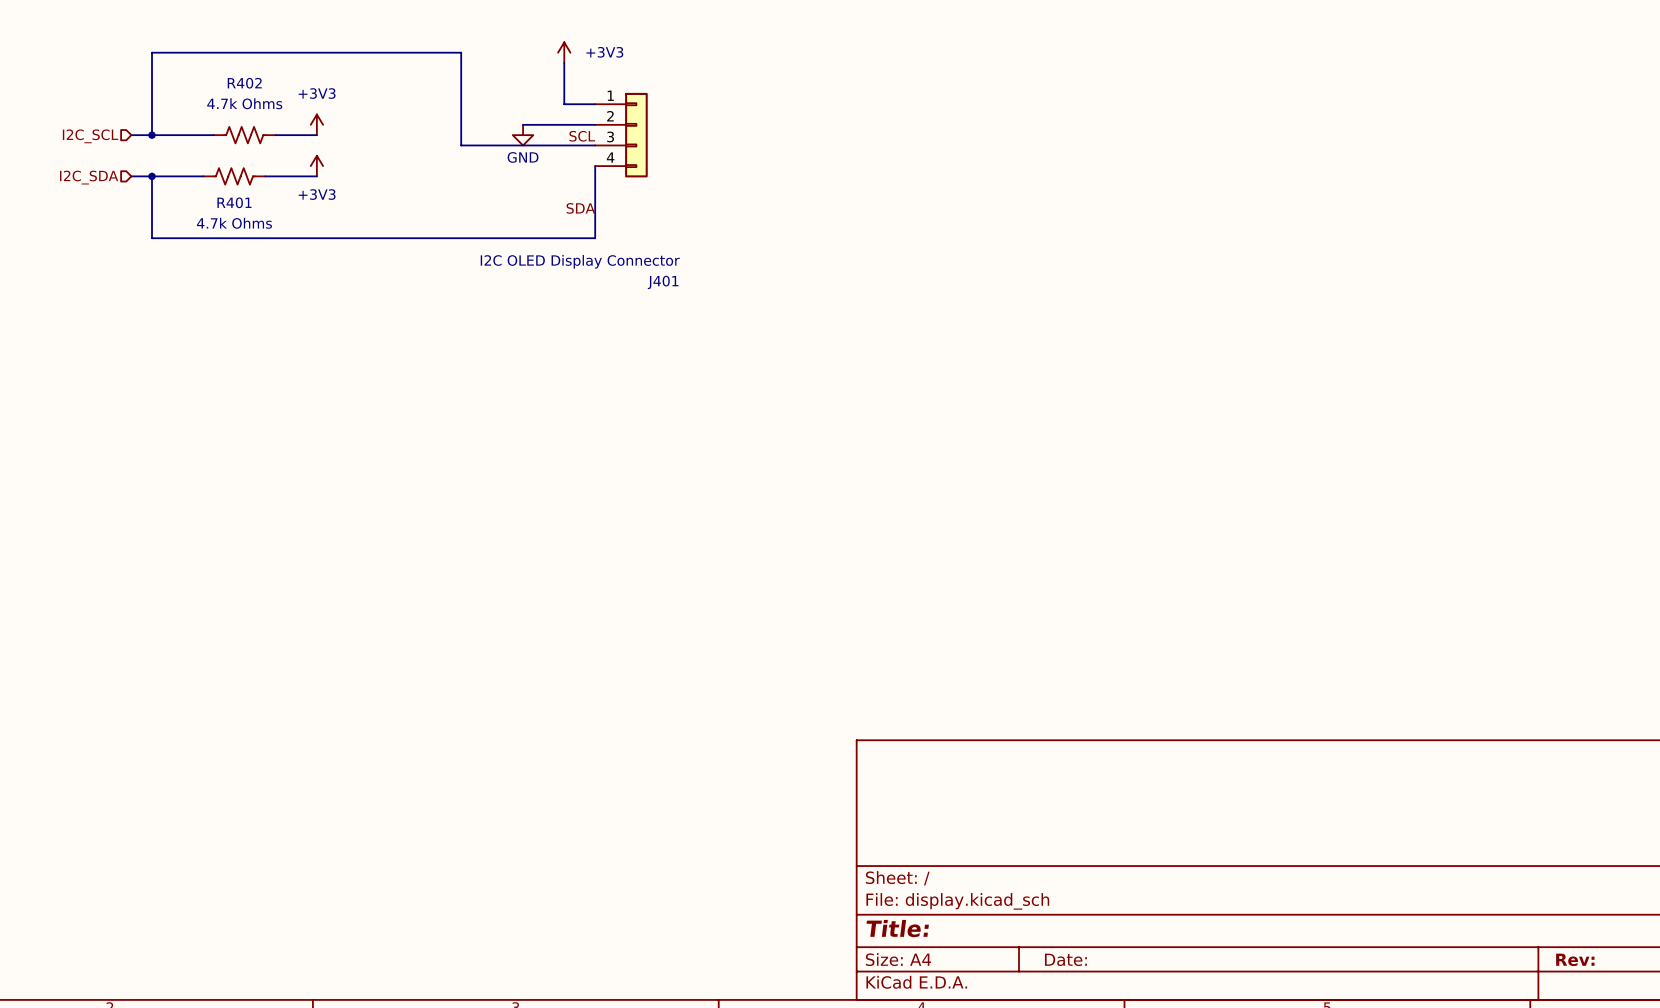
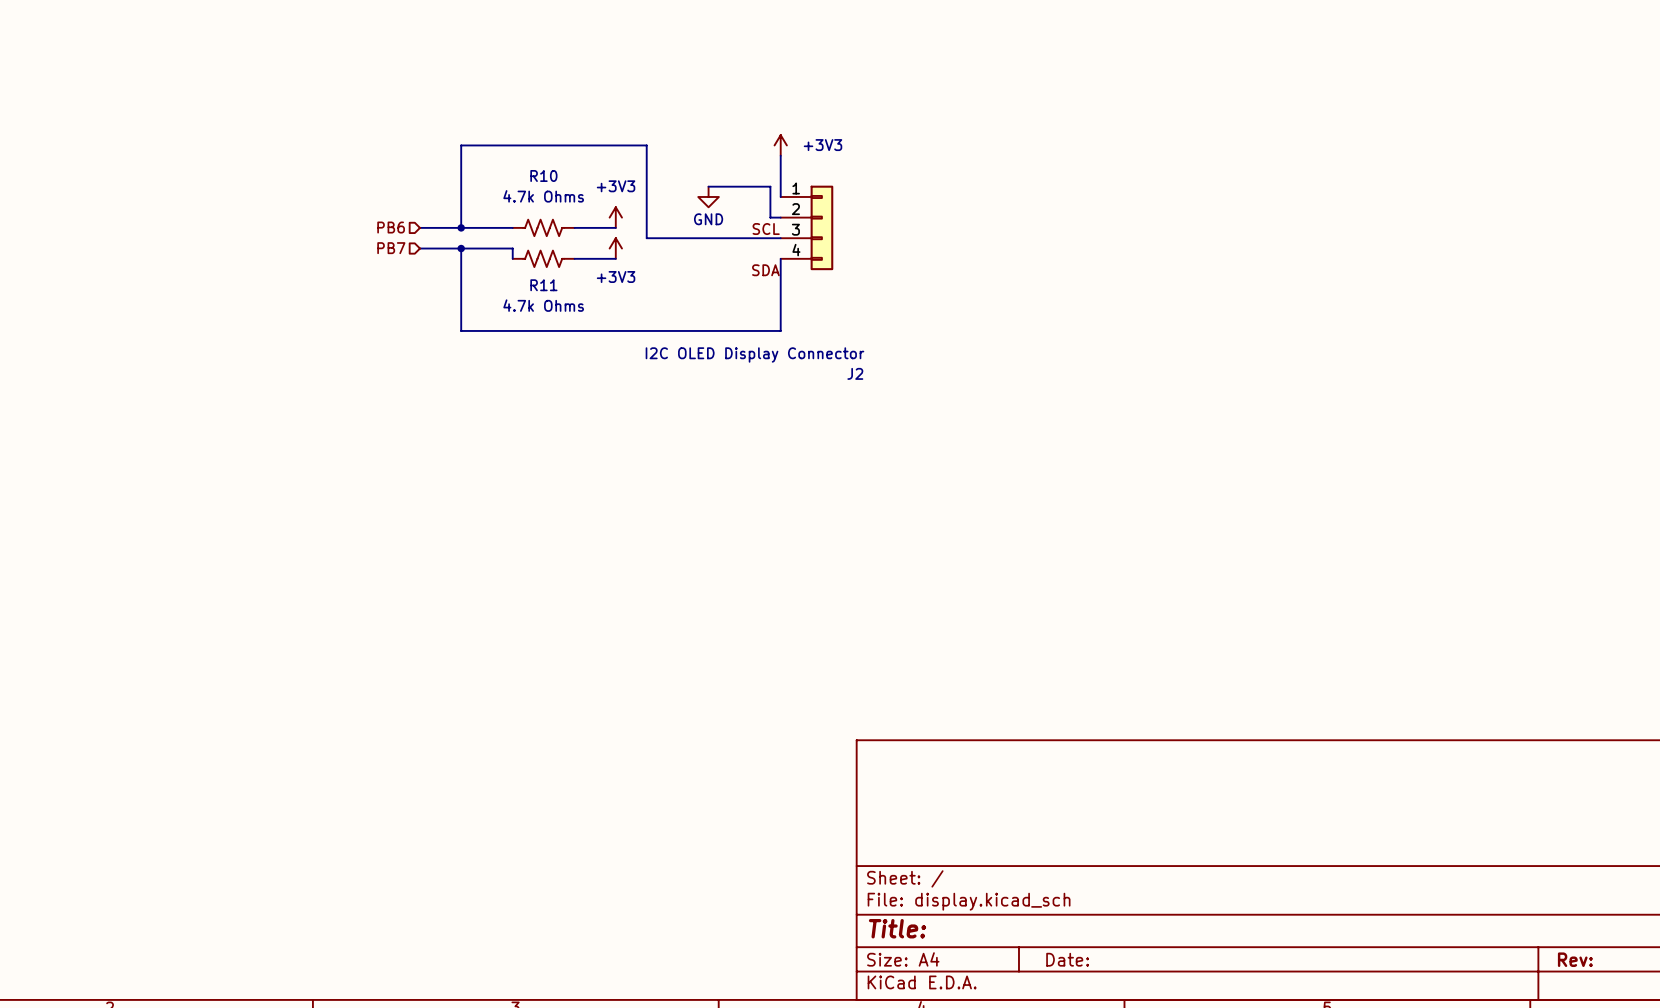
power symbol: +3V3 (564, 52) -> none
wire: (564, 63) (564, 104) (595, 104) -> none
power symbol: +3V3 (316, 124) -> none
wire: (523, 124) (595, 124) -> none
wire: (131, 135) (213, 135) -> none
wire: (152, 135) (152, 52) (461, 52) (461, 145) -> (461, 227) (461, 145)
junction: (152, 135) -> none
R402: 4.7k Ohms (244, 135) -> none
wire: (275, 135) (316, 135) -> none
power symbol position: GND (523, 135) -> GND (708, 196)
J401: I2C OLED Display Connector (621, 135) -> none
hierarchical label: I2C_SCL (90, 136) -> none
label: SCL (582, 136) -> none
wire: none -> (595, 145) (646, 145) (646, 238) (780, 238)
power symbol: none -> +3V3 (780, 145)
wire: none -> (780, 155) (780, 196)
power symbol: +3V3 (316, 166) -> none
wire: (595, 166) (595, 238) (152, 238) (152, 176) -> none
wire: (131, 176) (203, 176) -> none
junction: (152, 176) -> none
R401: 4.7k Ohms (234, 176) -> none
wire: (265, 176) (316, 176) -> none
hierarchical label: I2C_SDA (89, 177) -> none
wire: none -> (708, 186) (770, 186) (770, 217) (780, 217)
label position: SDA (580, 208) -> SDA (765, 270)
power symbol: none -> +3V3 (615, 217)
hierarchical label: none -> PB6 (391, 227)
wire: none -> (419, 227) (512, 227)
junction: none -> (461, 227)
R10: none -> 4.7k Ohms (543, 227)
wire: none -> (574, 227) (615, 227)
J2: none -> I2C OLED Display Connector (806, 227)
label: none -> SCL (766, 229)
hierarchical label: none -> PB7 (391, 248)
wire: none -> (419, 248) (512, 248) (512, 258)
wire: none -> (461, 248) (461, 330) (780, 330) (780, 258)
junction: none -> (461, 248)
power symbol: none -> +3V3 (615, 248)
R11: none -> 4.7k Ohms (543, 258)
wire: none -> (574, 258) (615, 258)

